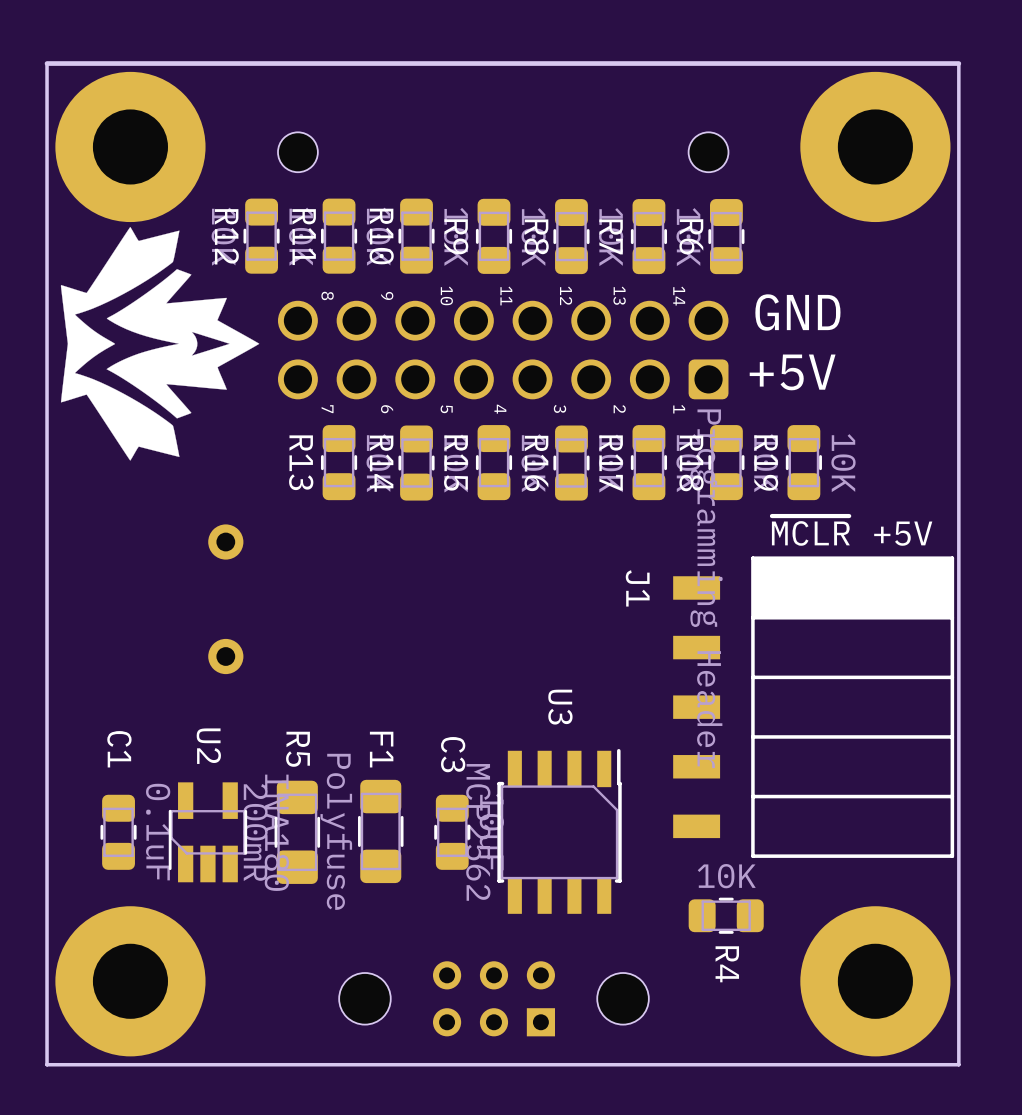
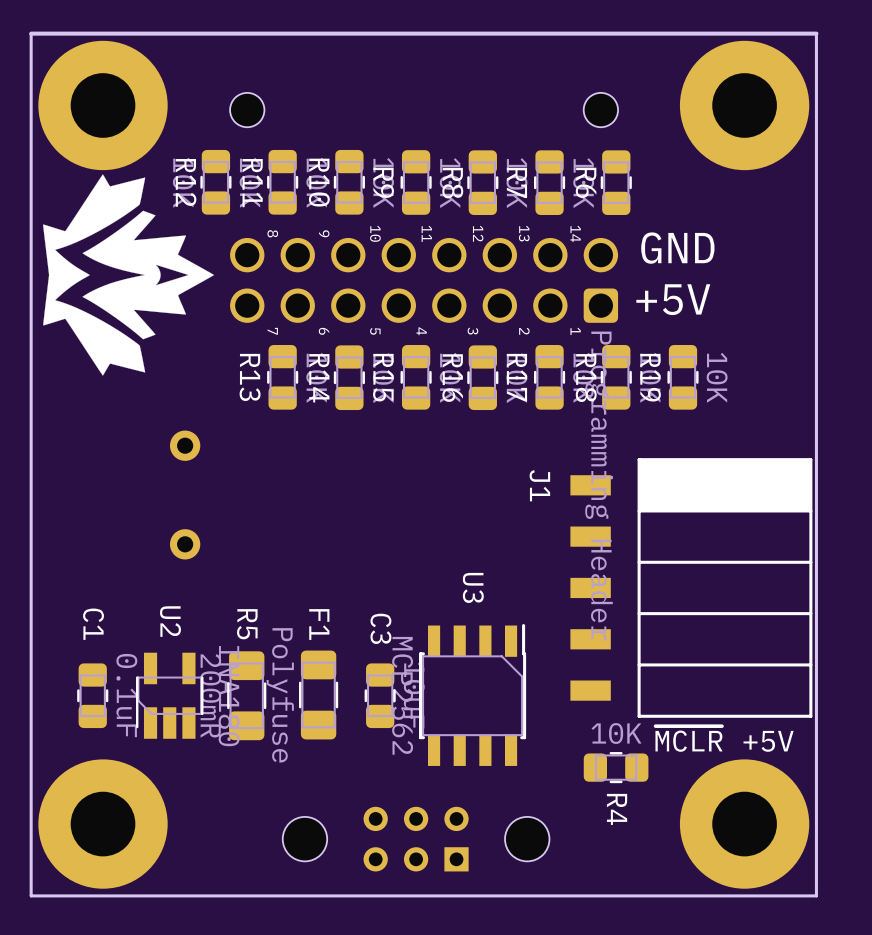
text position: ~{MCLR} +5V (852, 530) -> ~{MCLR} +5V (724, 738)

